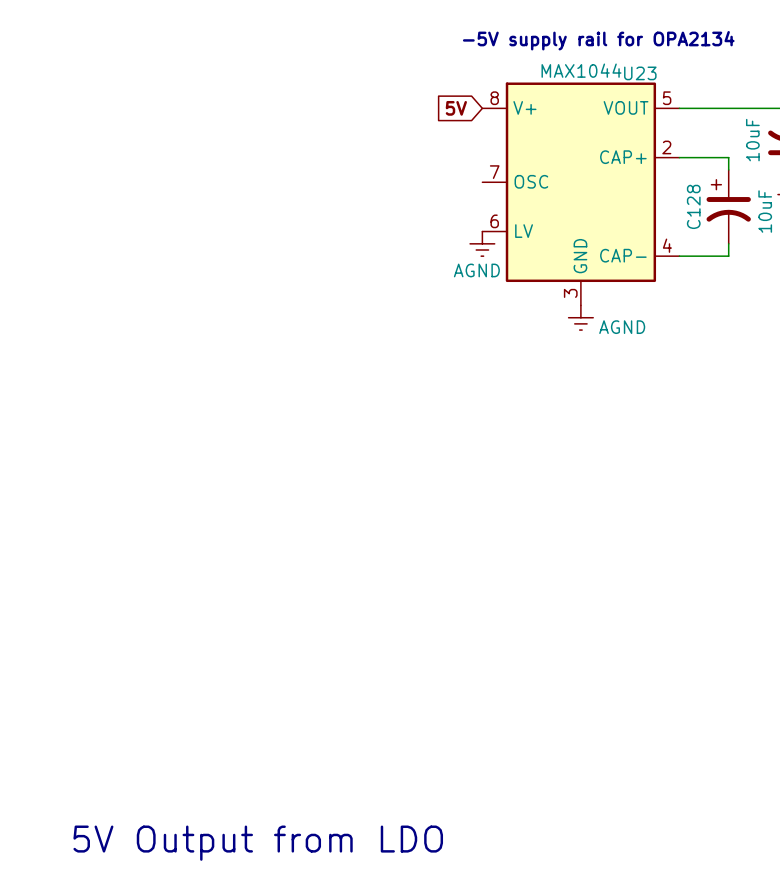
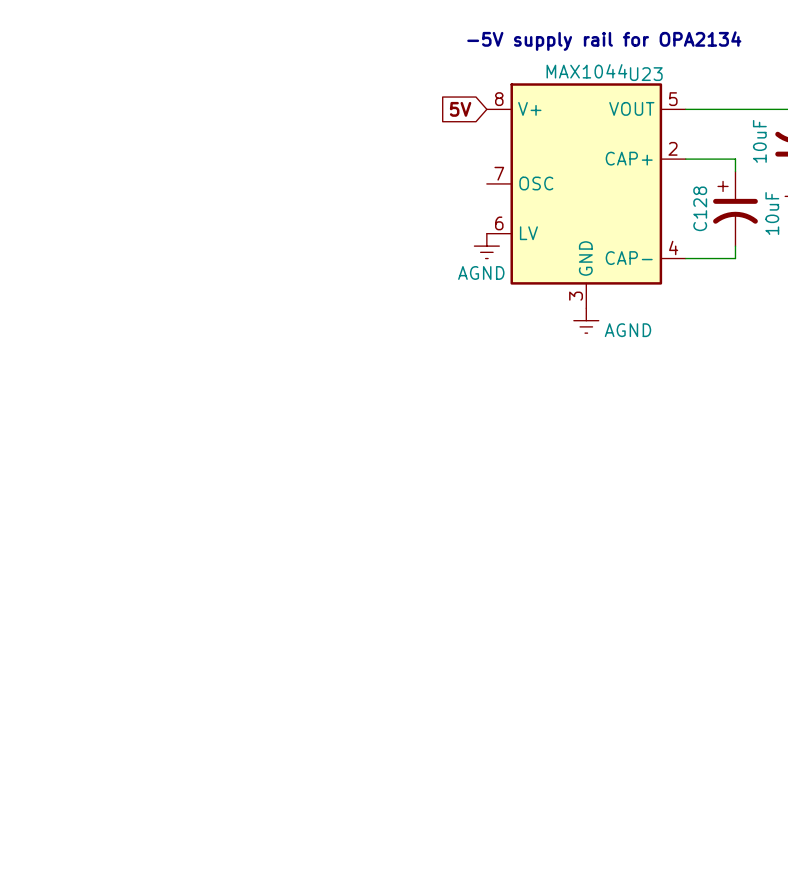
text: 5V Output from LDO (258, 843) -> none

